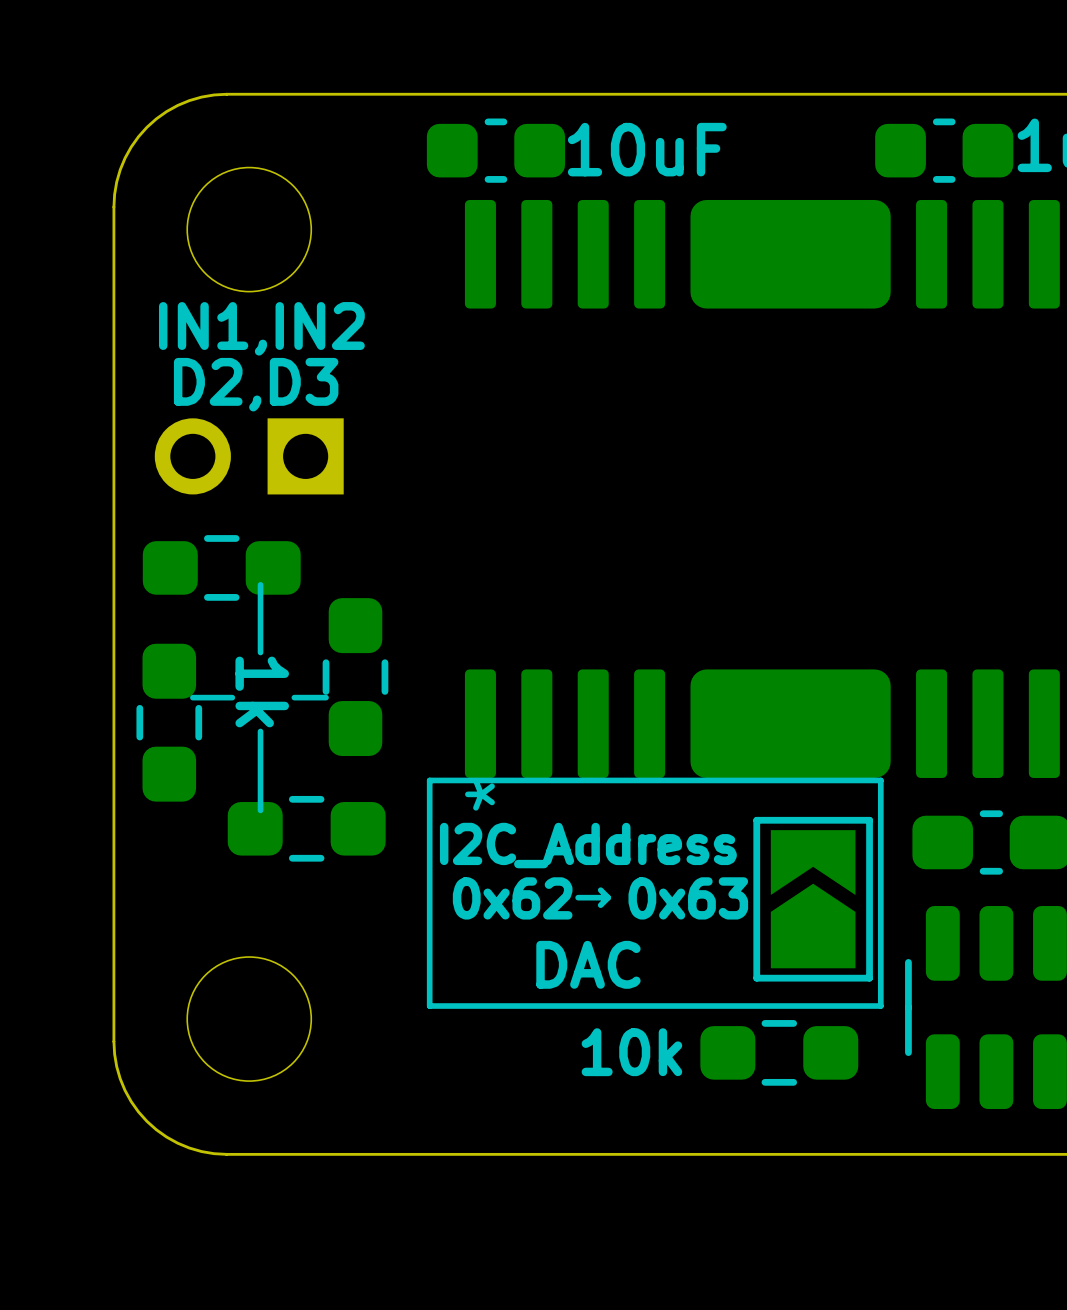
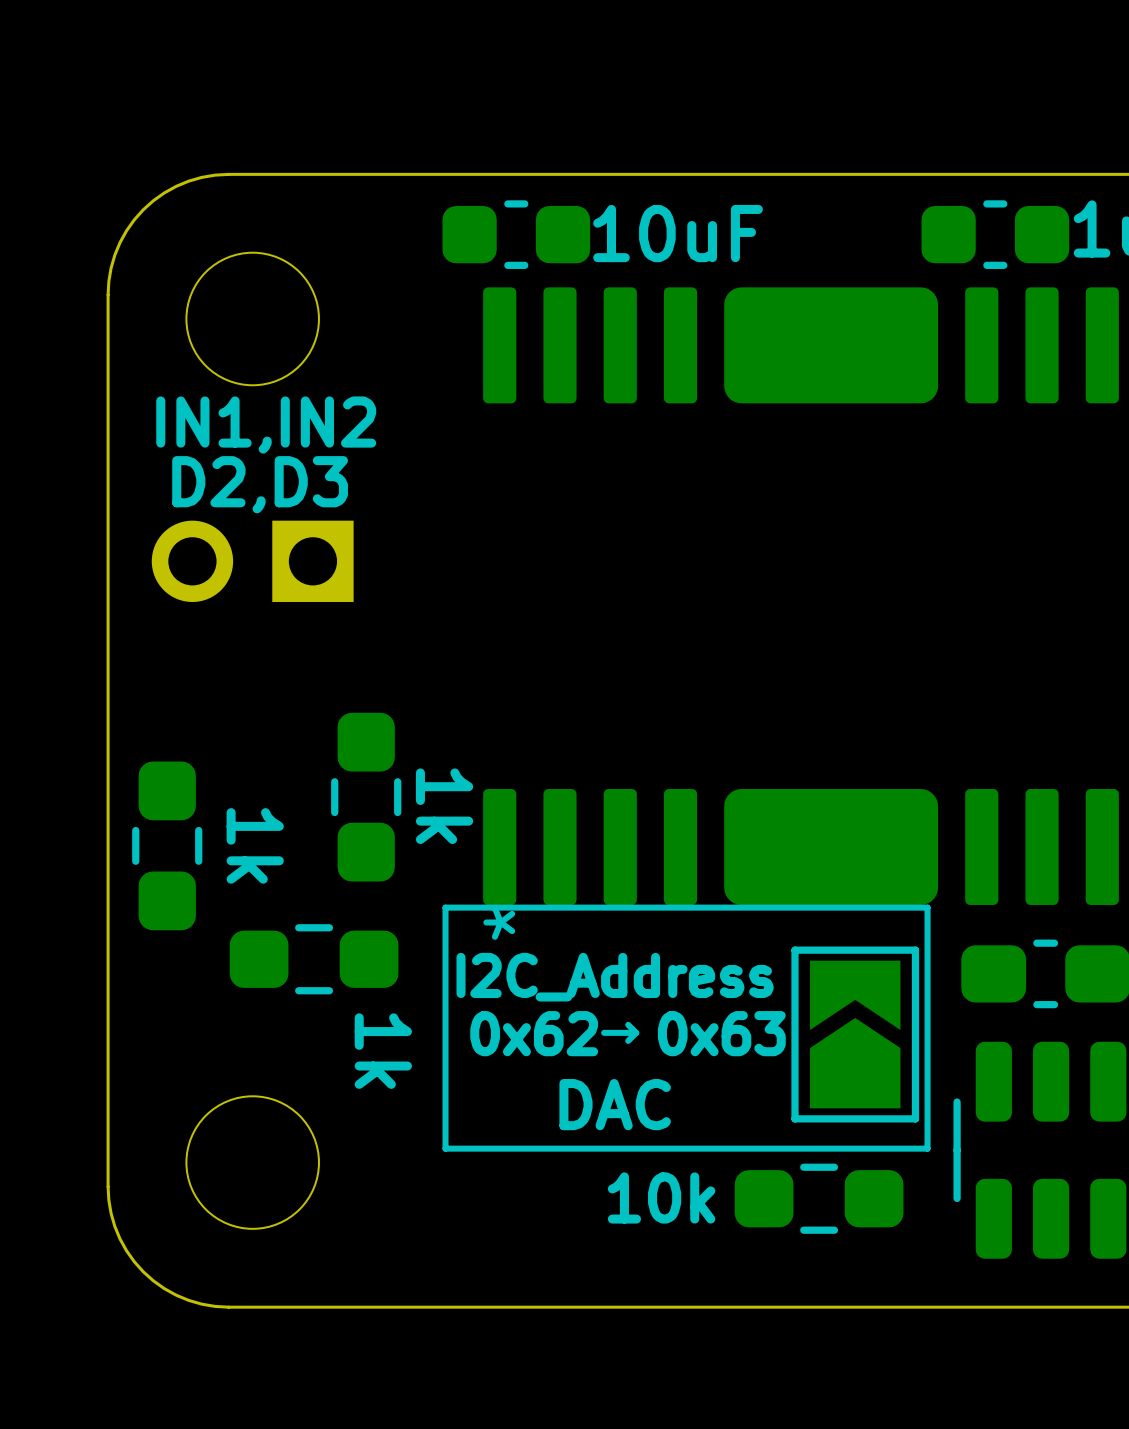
part: (221, 567) -> none
line: (260, 584) (260, 652) -> none
part value position: 1k (262, 691) -> 1k (444, 806)
line: (232, 697) (192, 697) -> none
line: (326, 697) (294, 697) -> none
part value: none -> 1k (255, 845)
line: (260, 731) (260, 810) -> none
part value: none -> 1k (383, 1051)

